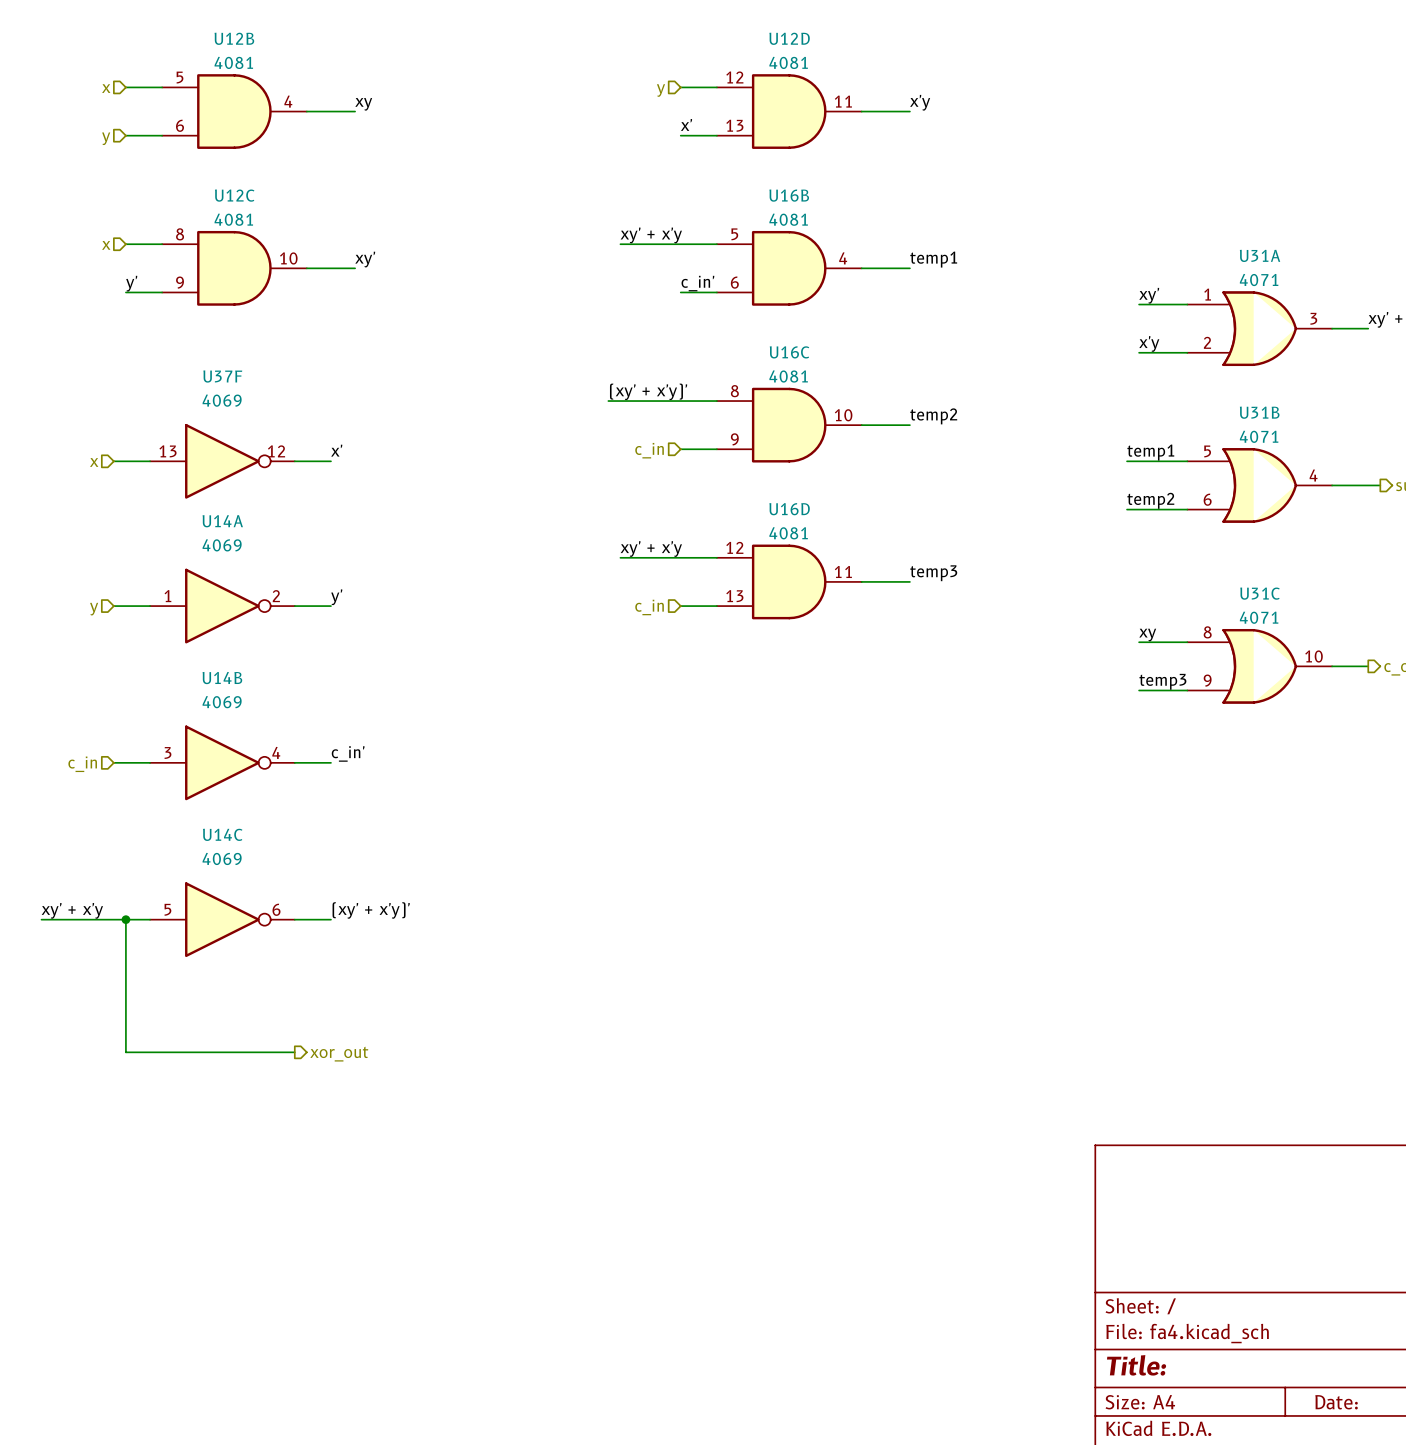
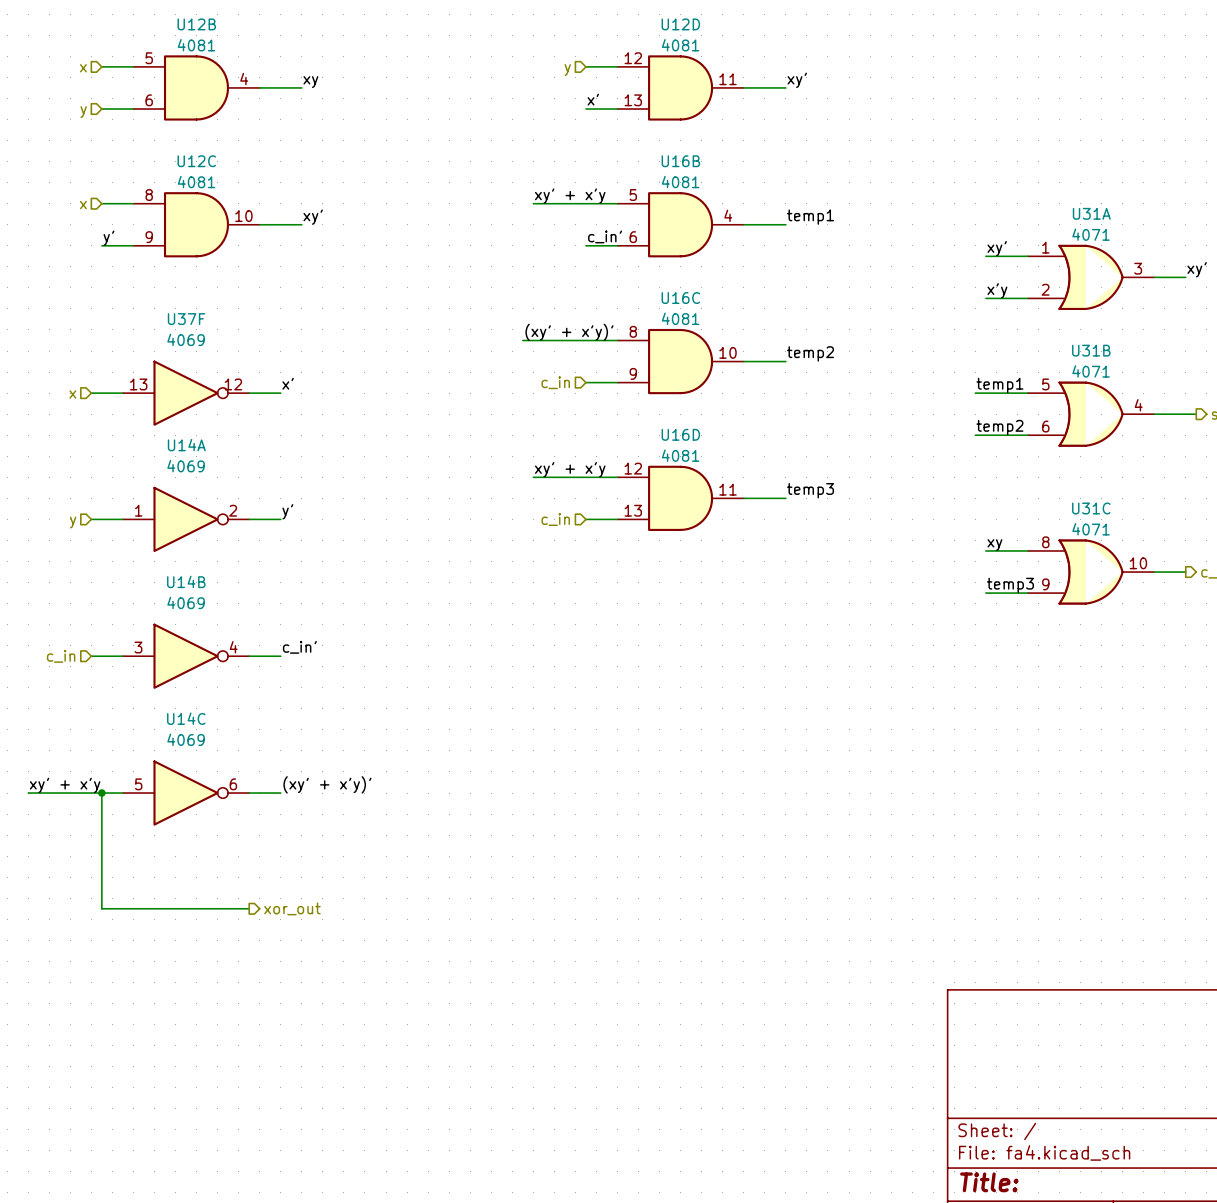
label: x'y (920, 102) -> xy' (797, 80)

